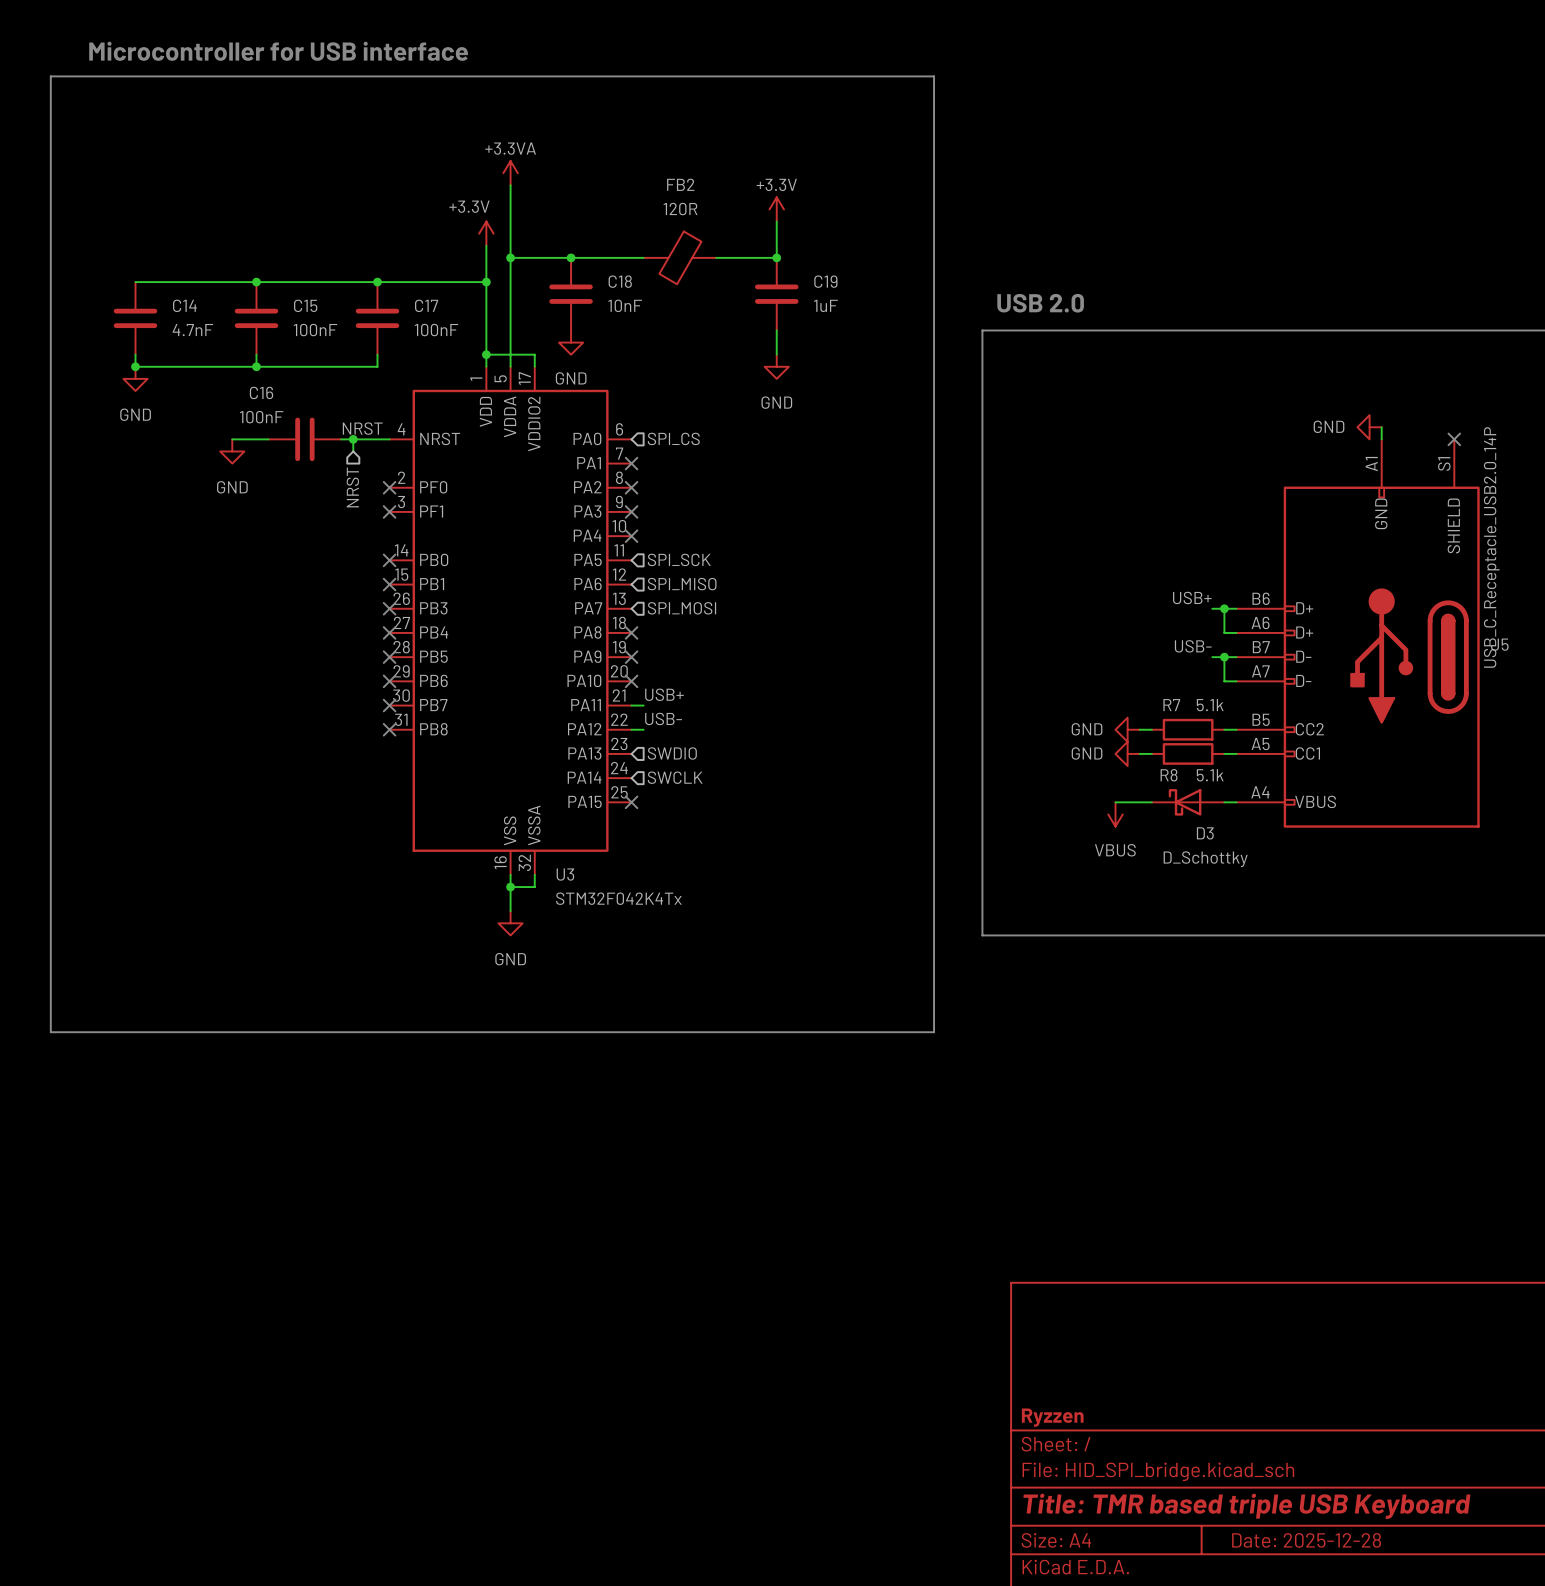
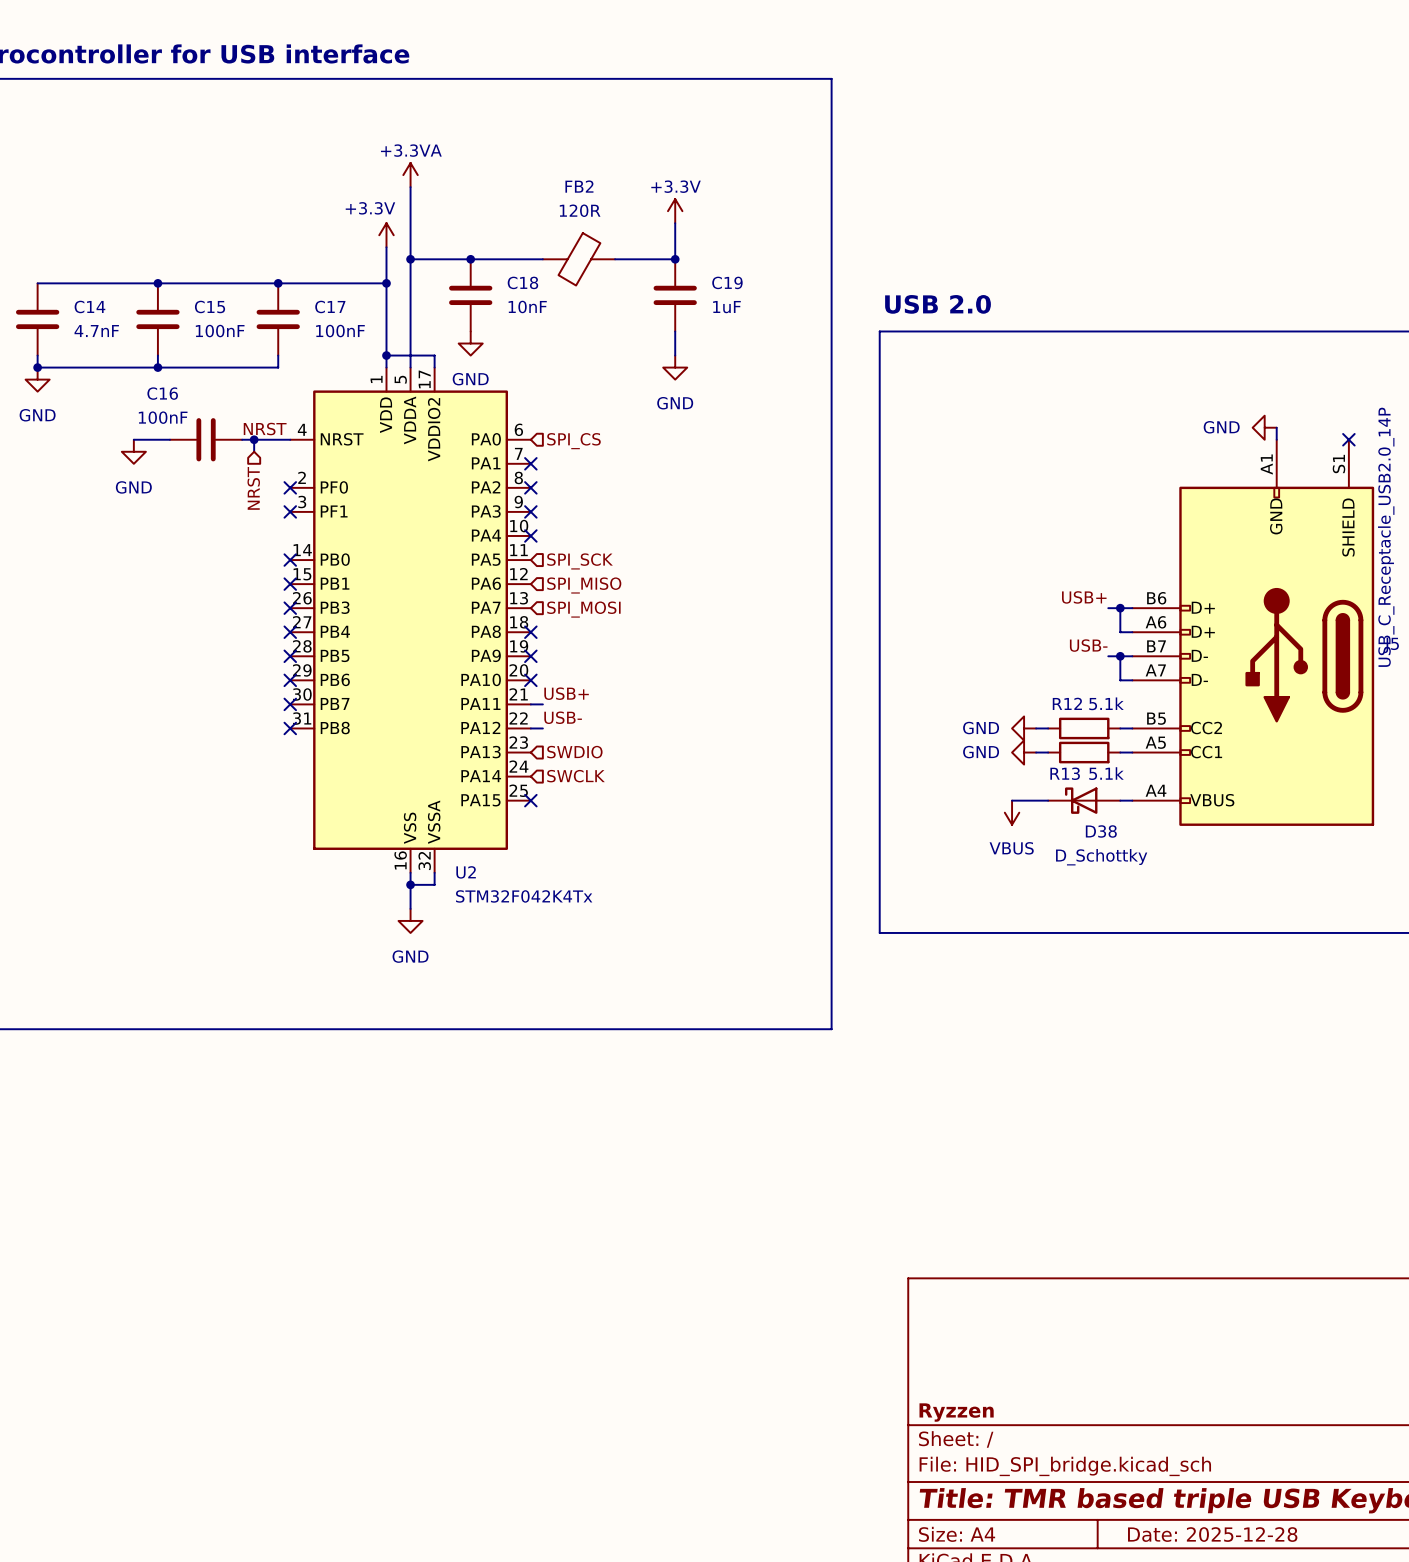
R7 name: R7 (1171, 705) -> R12 (1067, 703)
R8 name: R8 (1169, 775) -> R13 (1065, 773)
D3 name: D3 (1205, 833) -> D38 (1101, 831)
U3 name: U3 (565, 874) -> U2 (466, 872)

